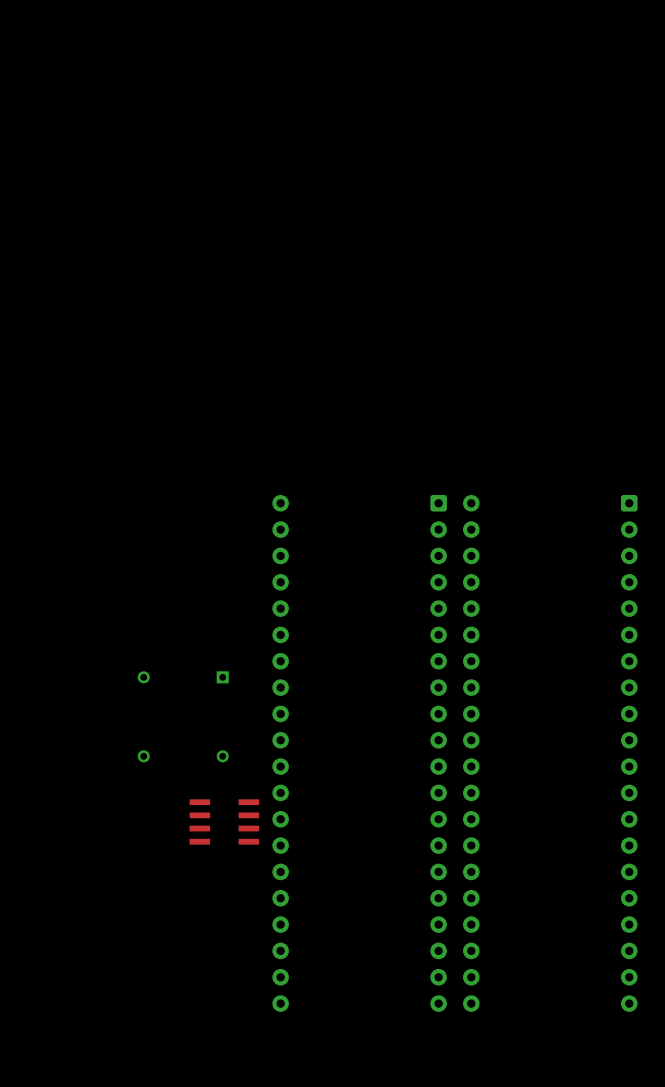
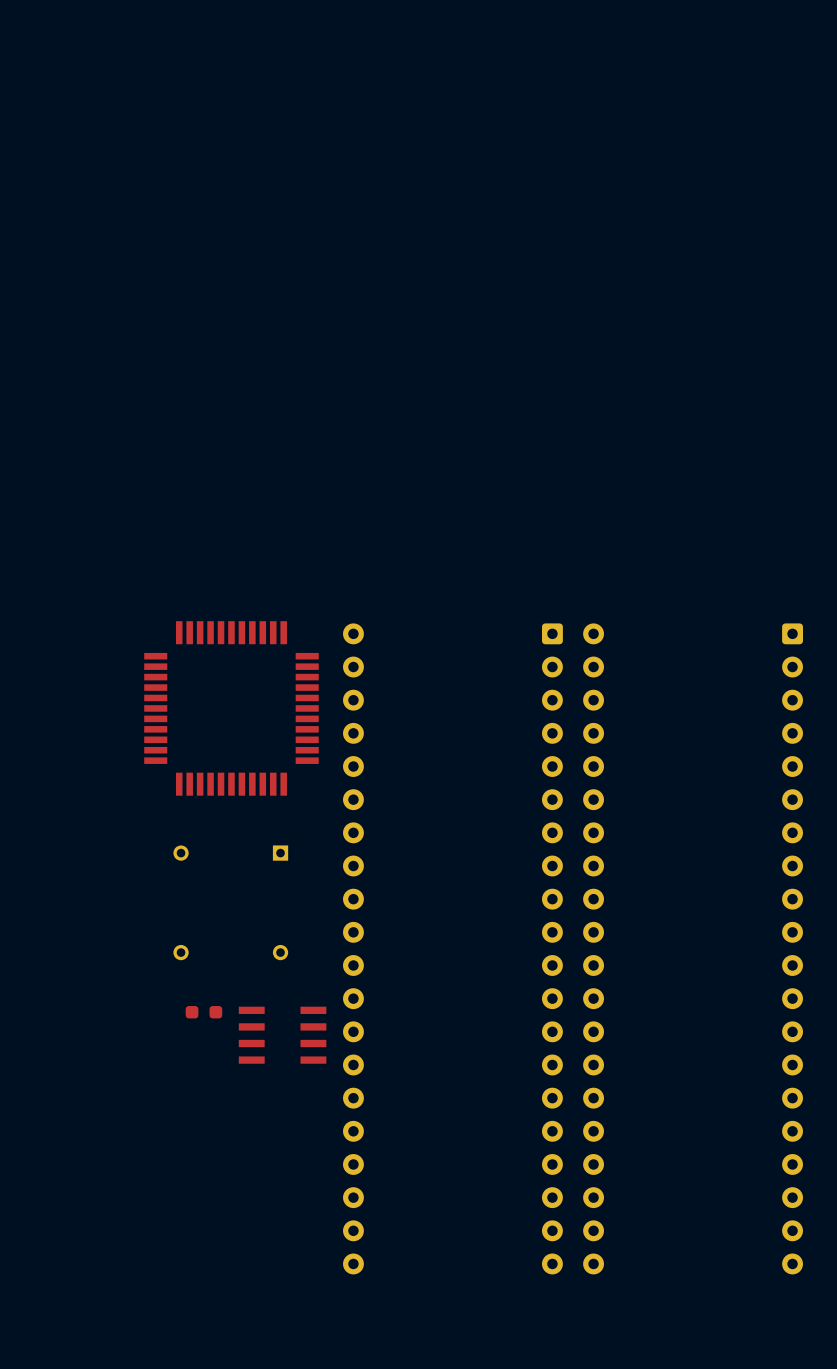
part: none -> (231, 708)
part: none -> (203, 1012)

